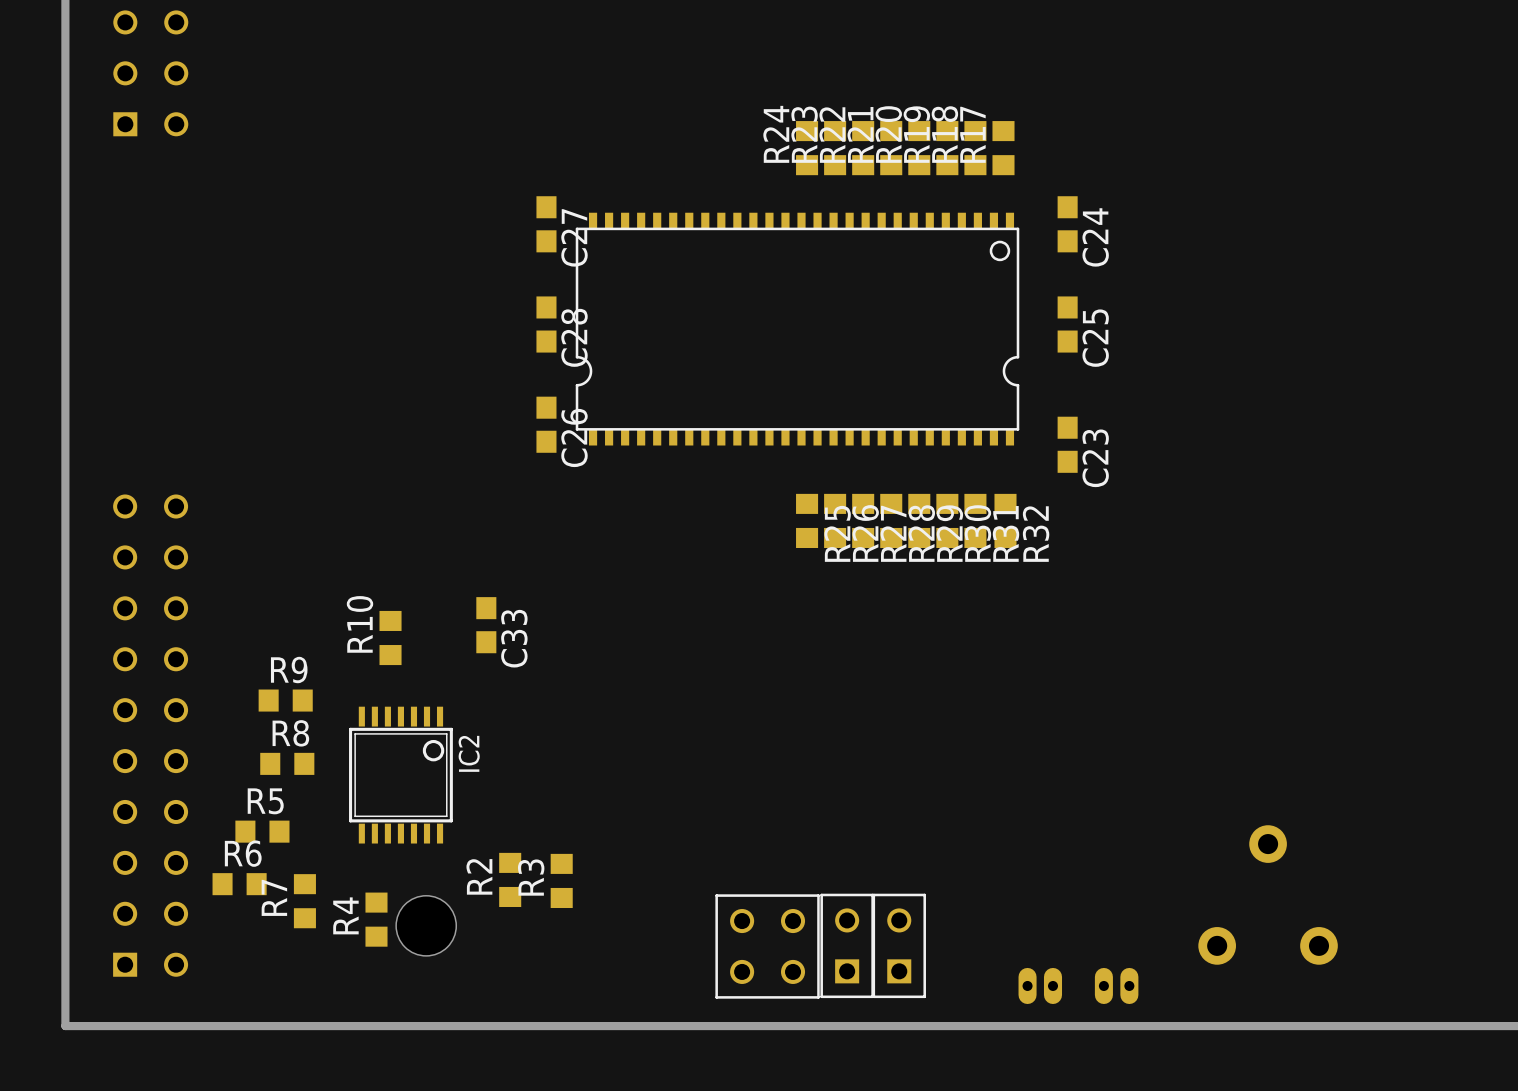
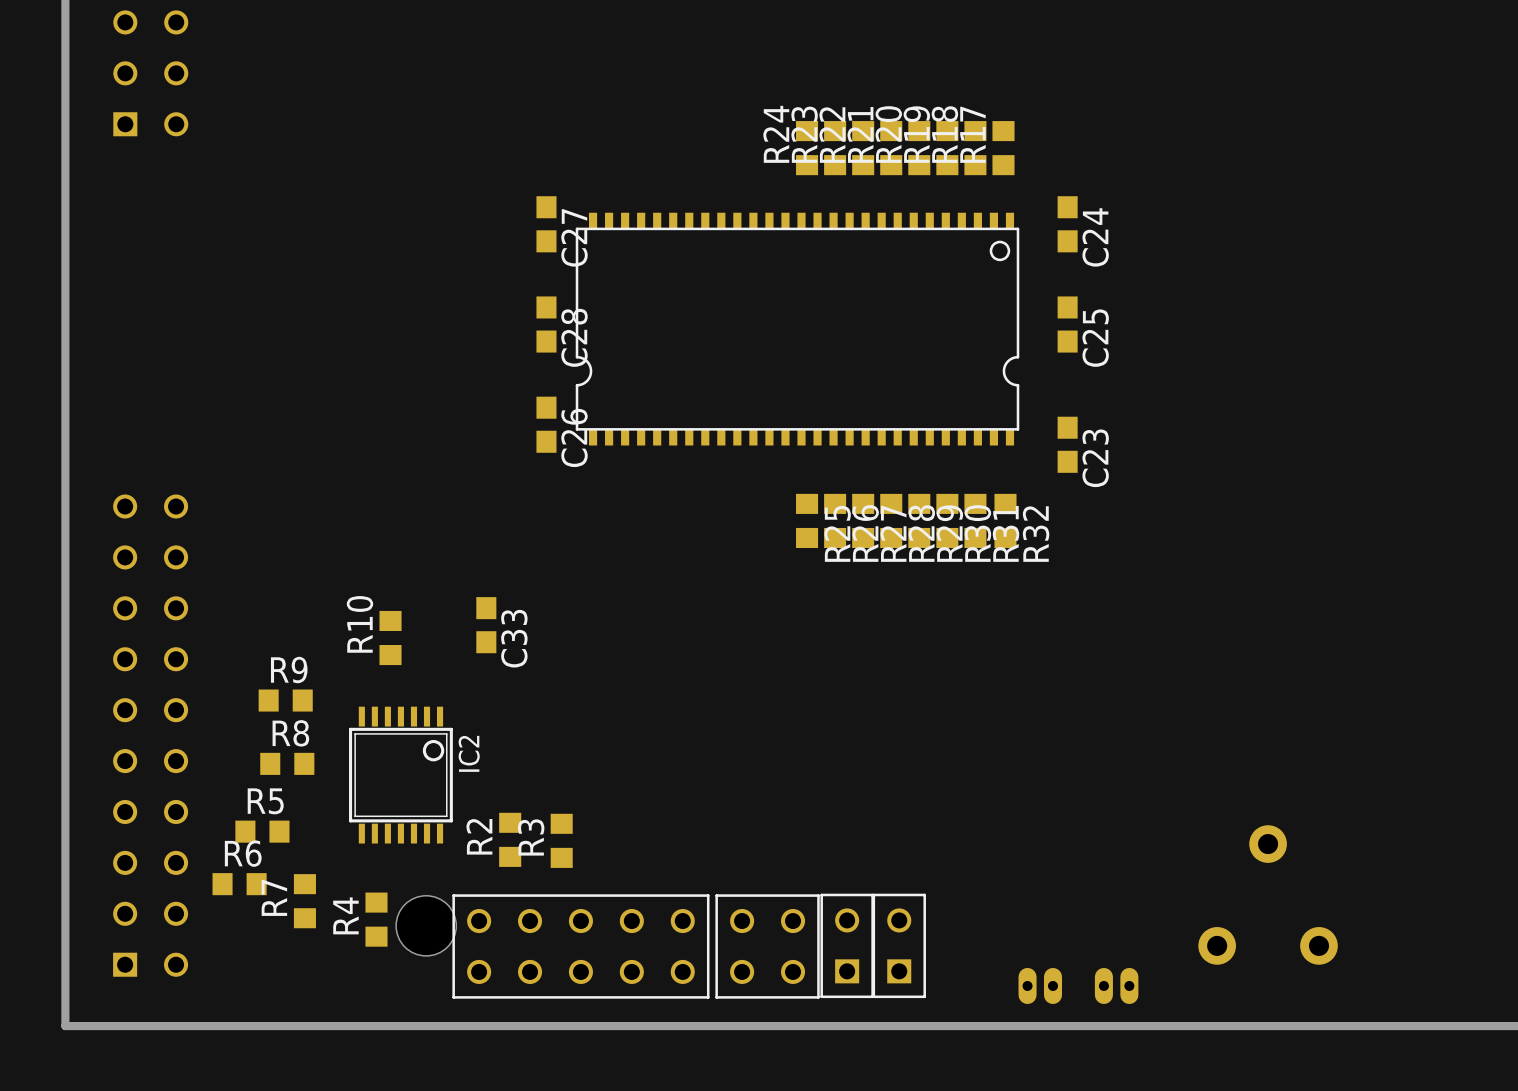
R2 position: (510, 879) -> (510, 839)
R3 position: (561, 880) -> (561, 840)
part: none -> (580, 946)

